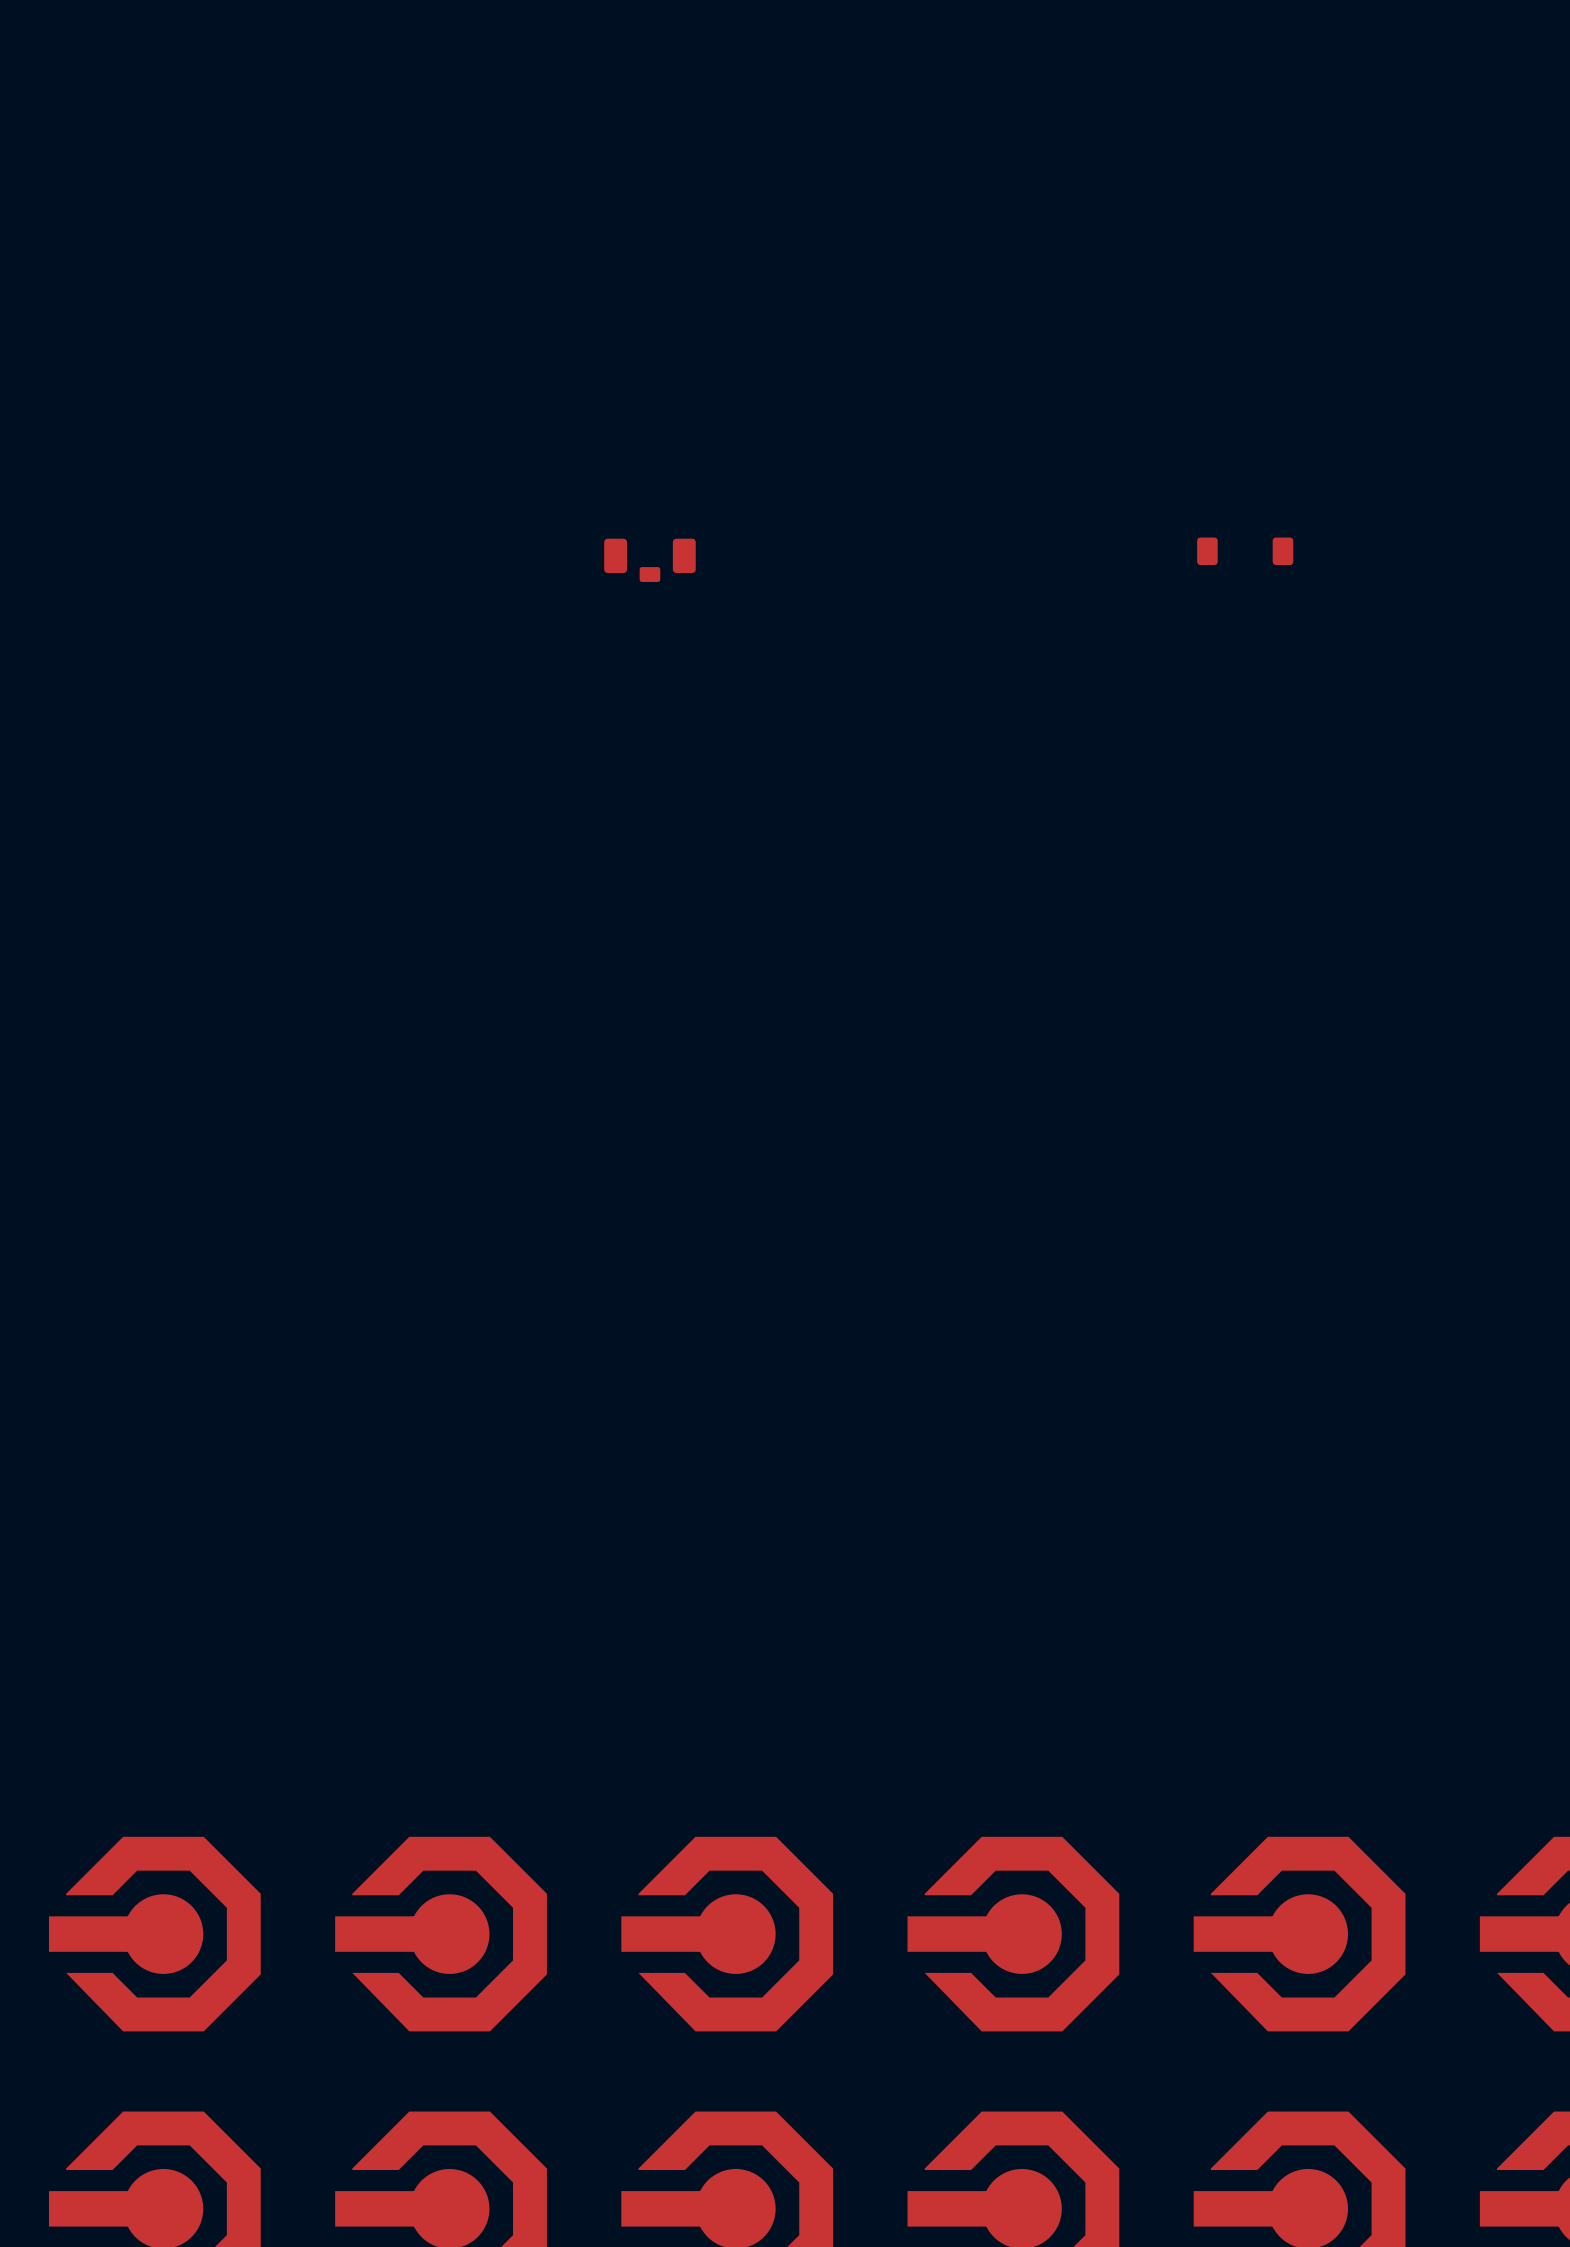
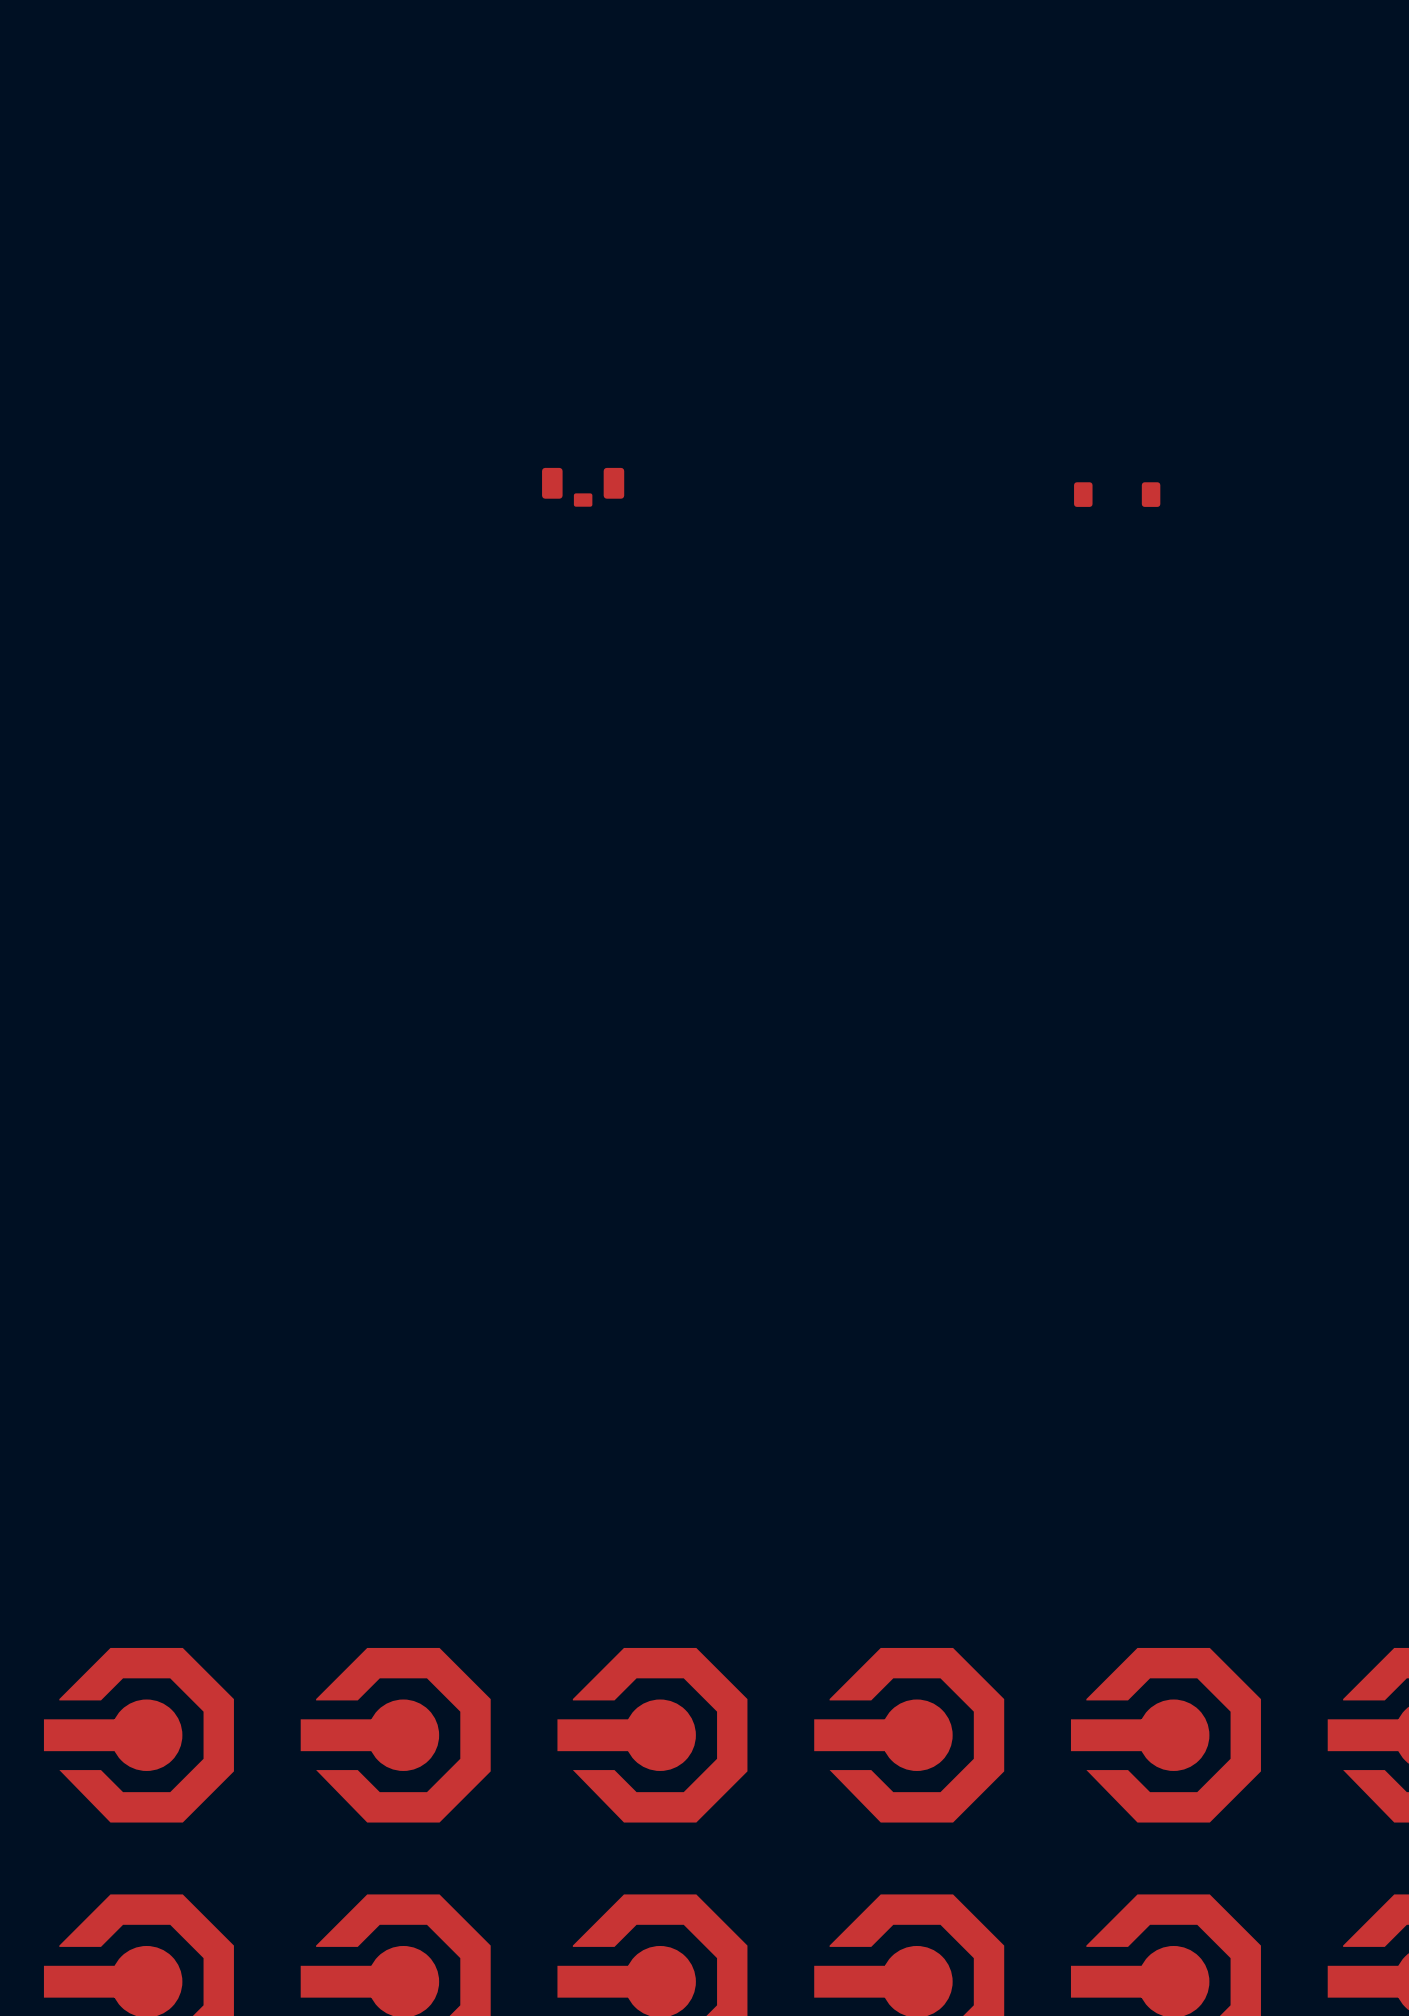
part position: (649, 560) -> (583, 487)

